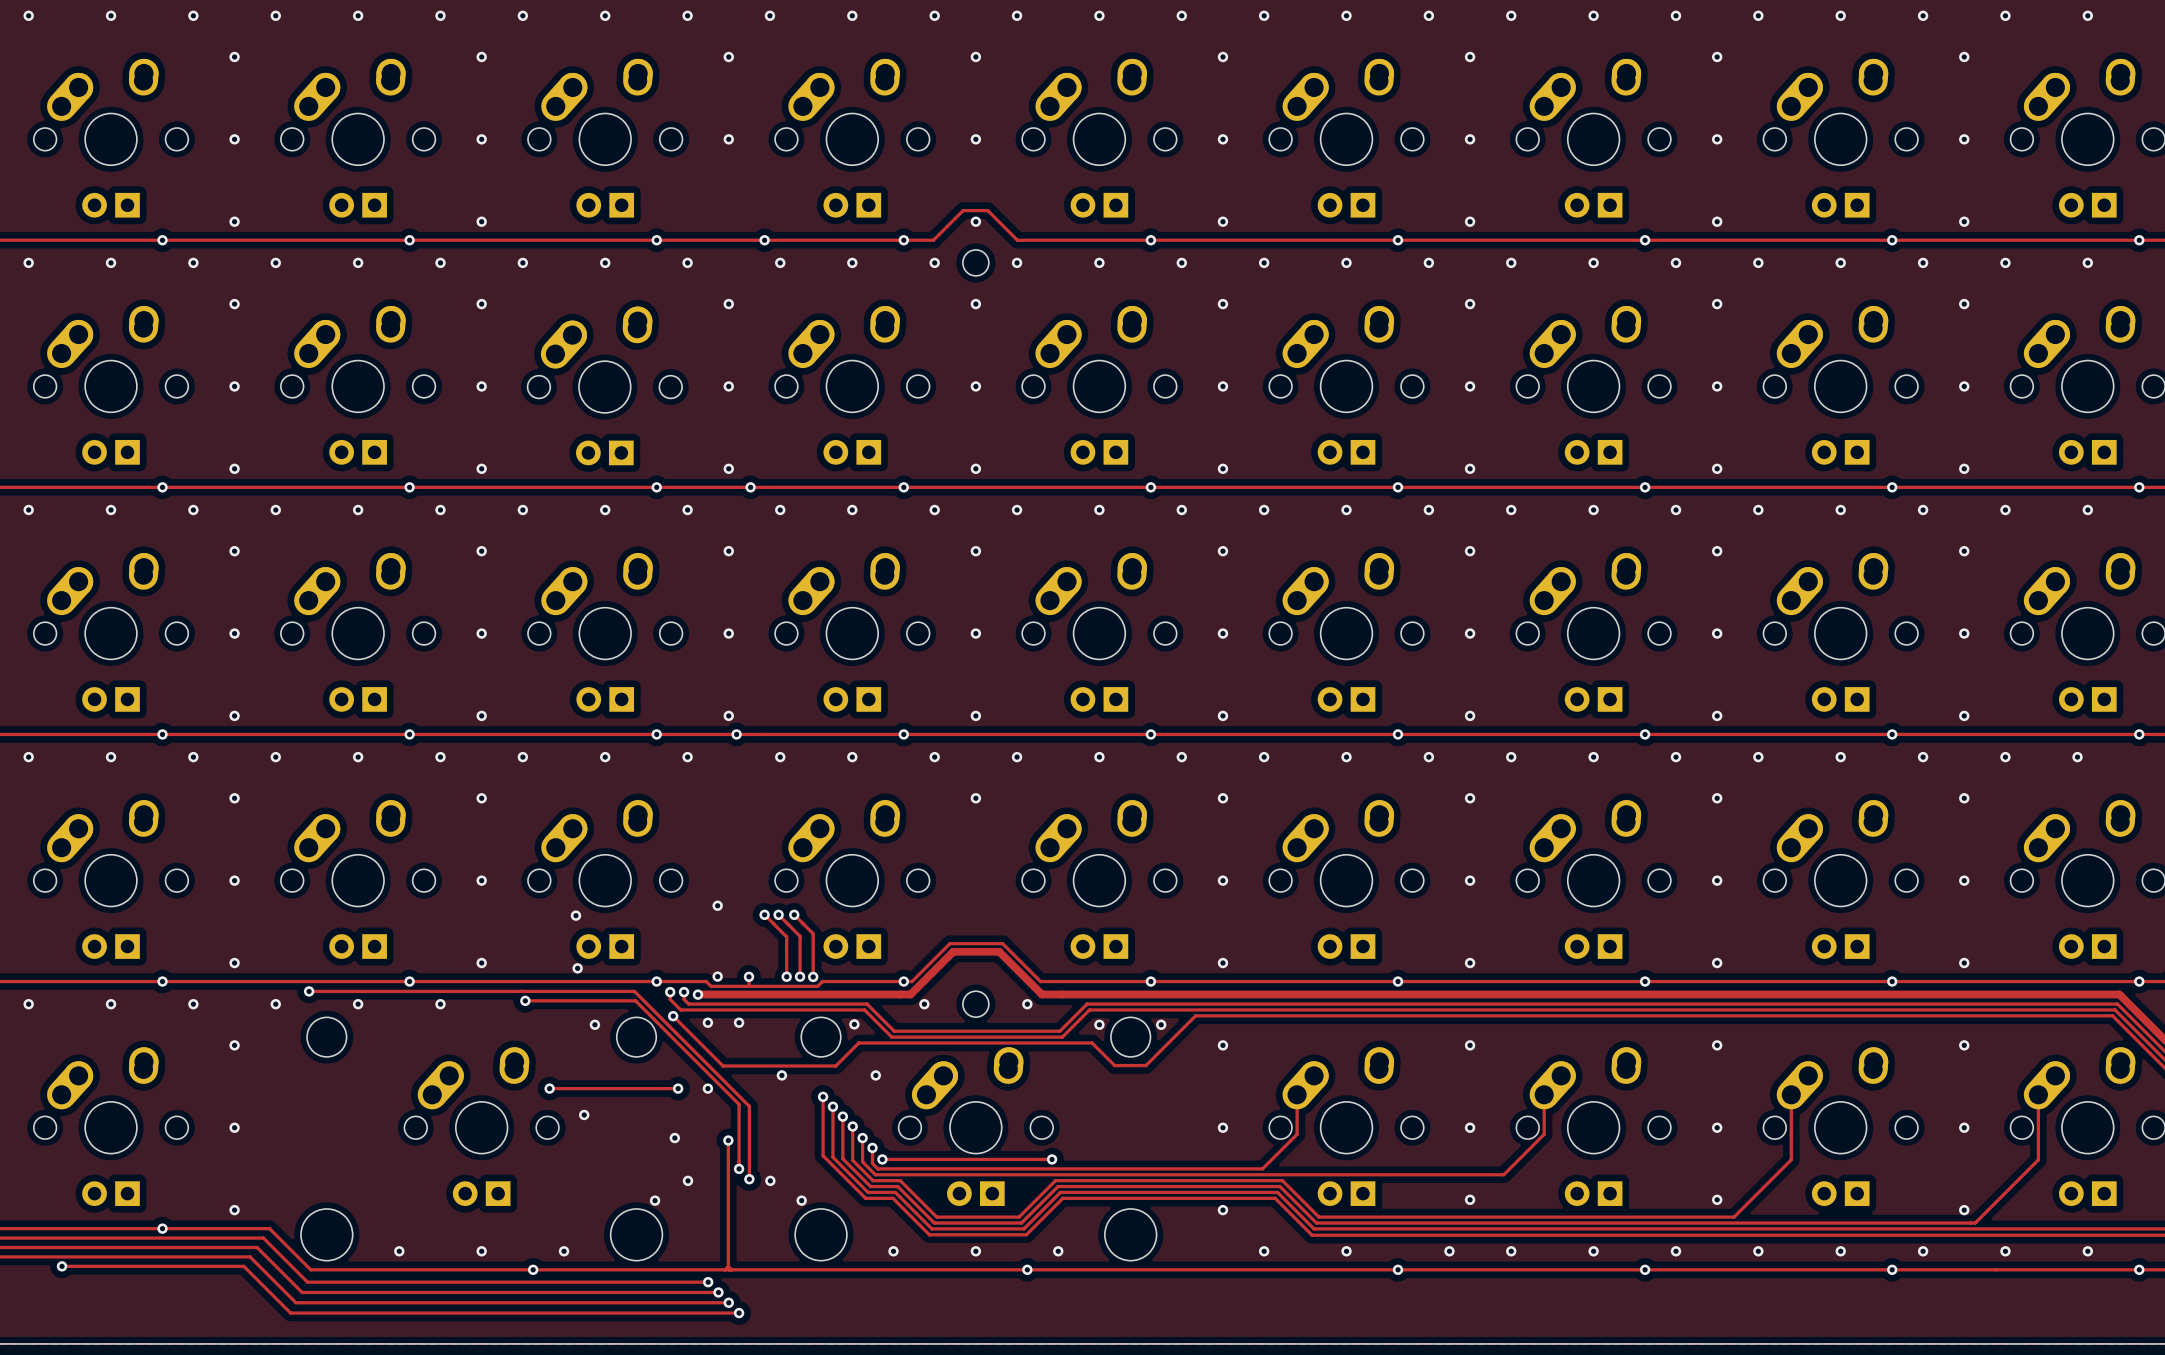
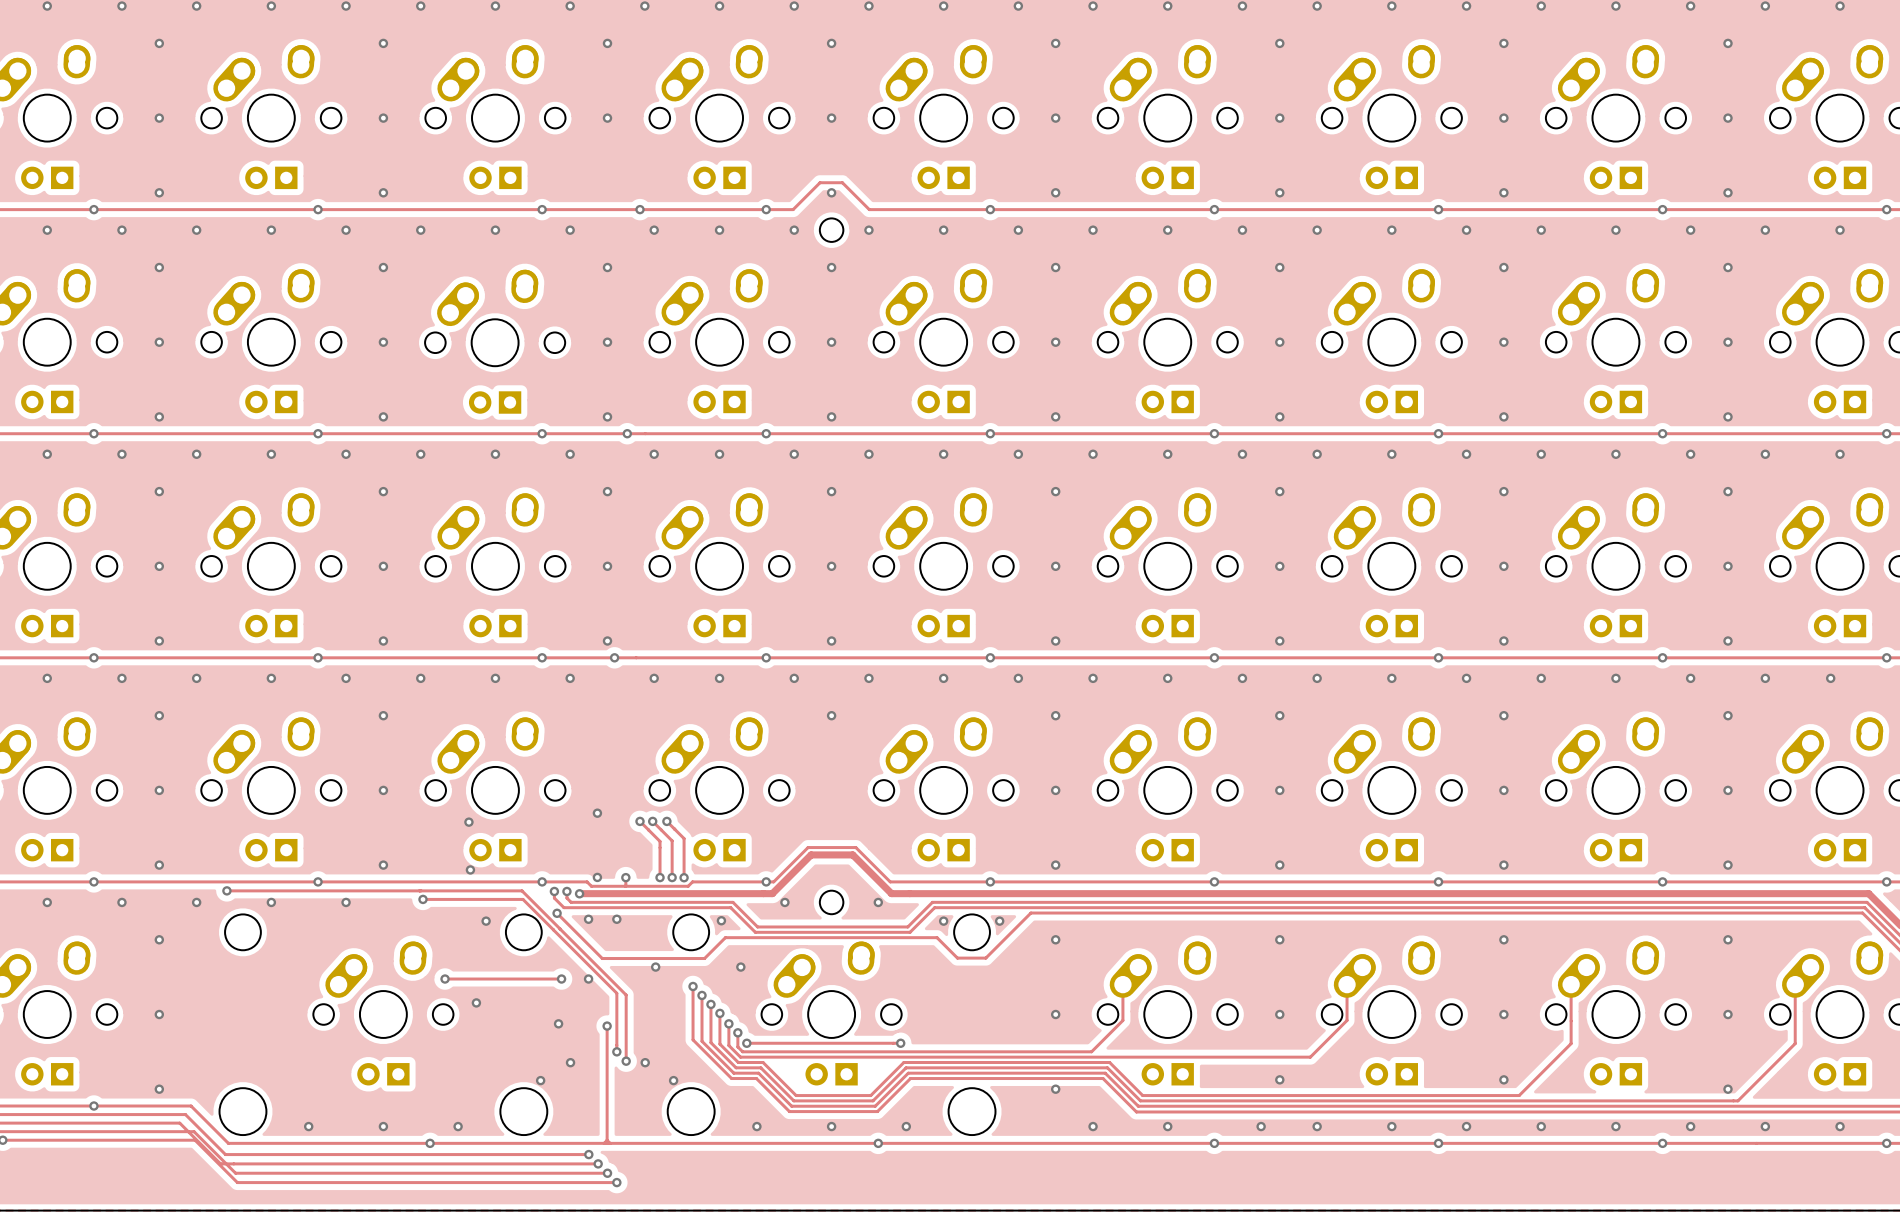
track: (250, 1256) (295, 1302) (318, 1302) -> (173, 1131) (194, 1131) (235, 1173)
track: (243, 1266) (290, 1313) (320, 1313) -> (167, 1140) (195, 1140) (237, 1182)

